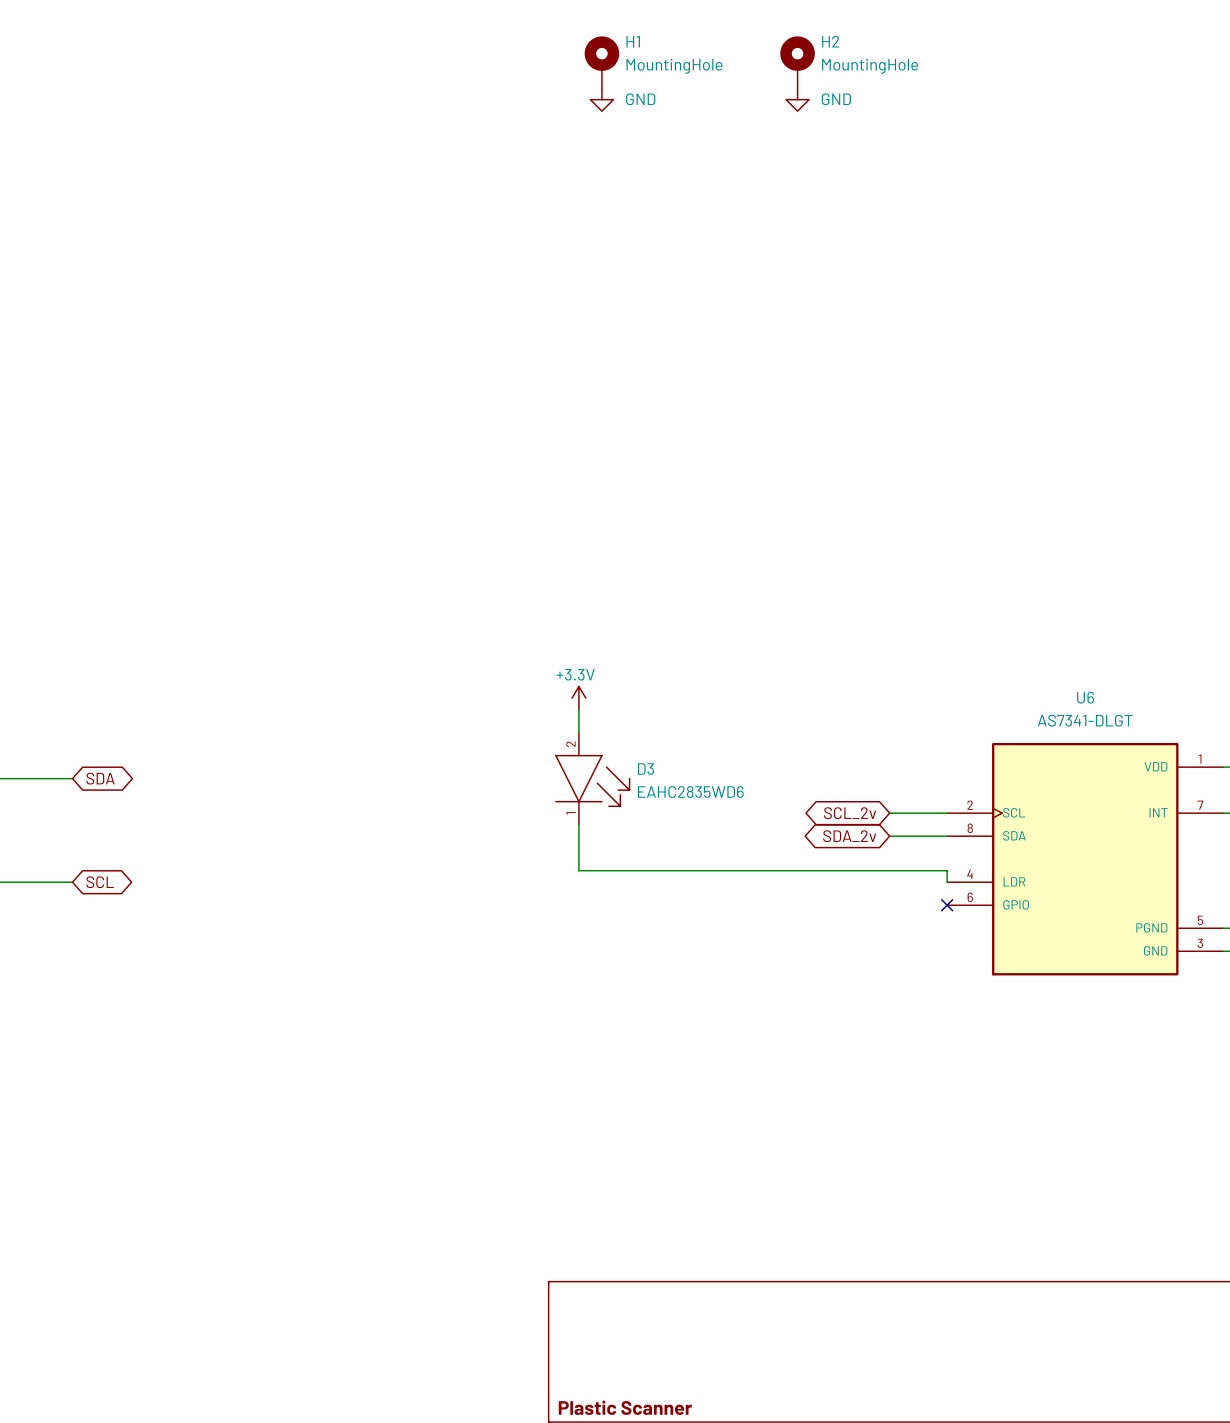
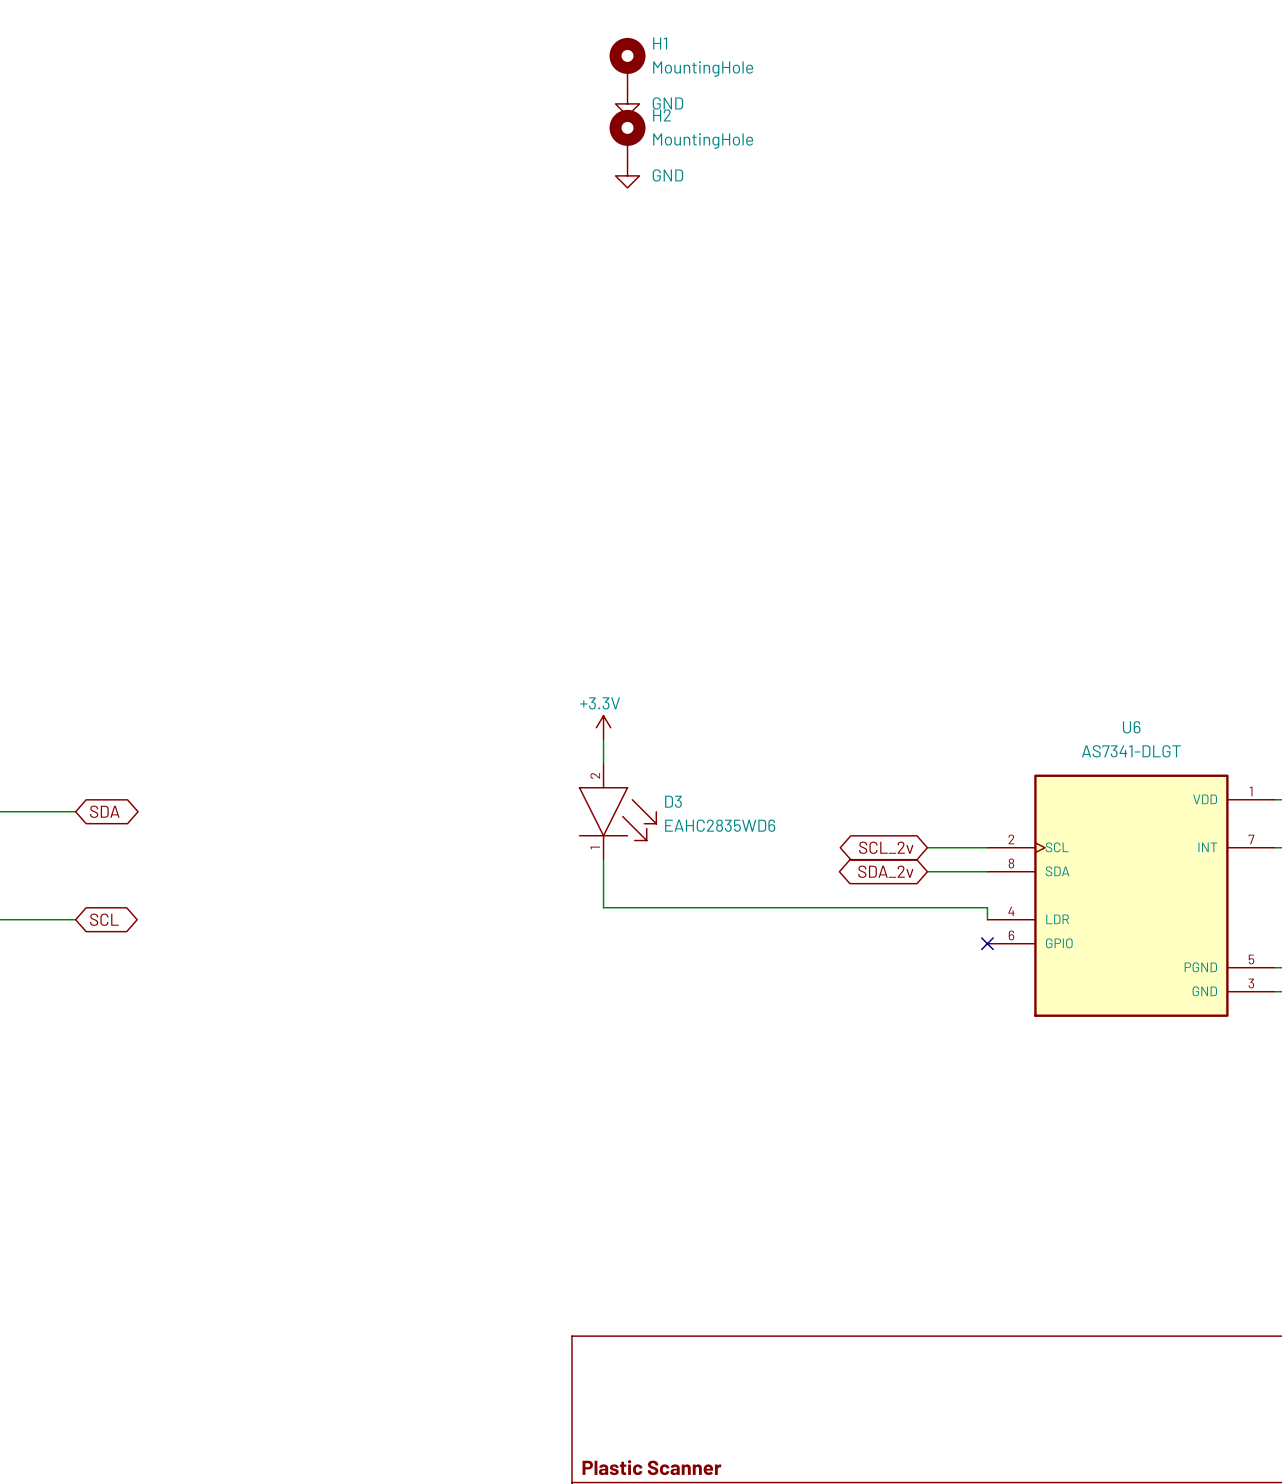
H2 position: (797, 62) -> (627, 136)
power symbol position: GND (797, 99) -> GND (627, 175)

